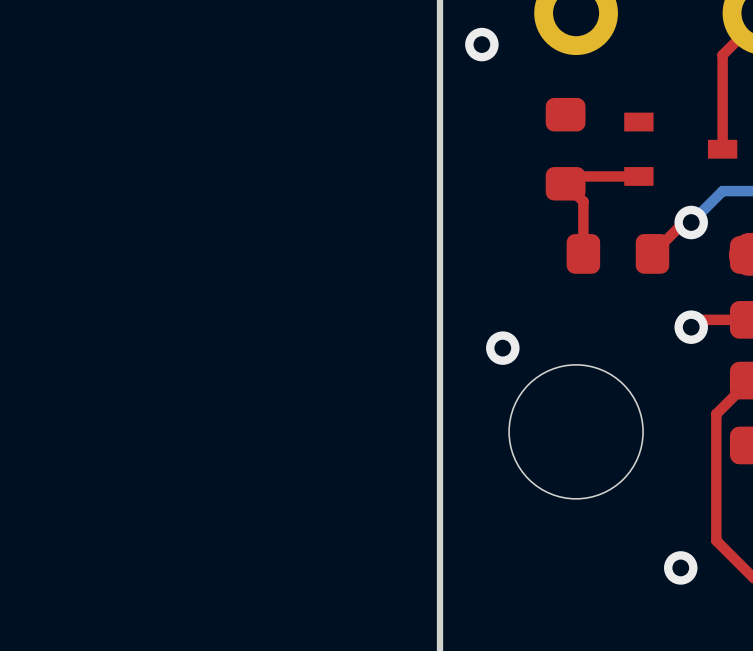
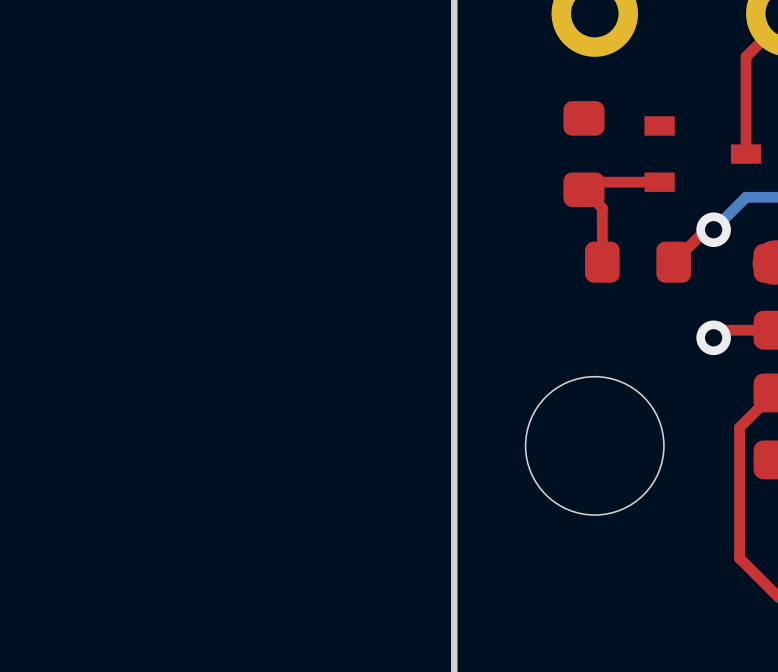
via: (481, 44) -> none
via: (502, 348) -> none
via: (680, 567) -> none

